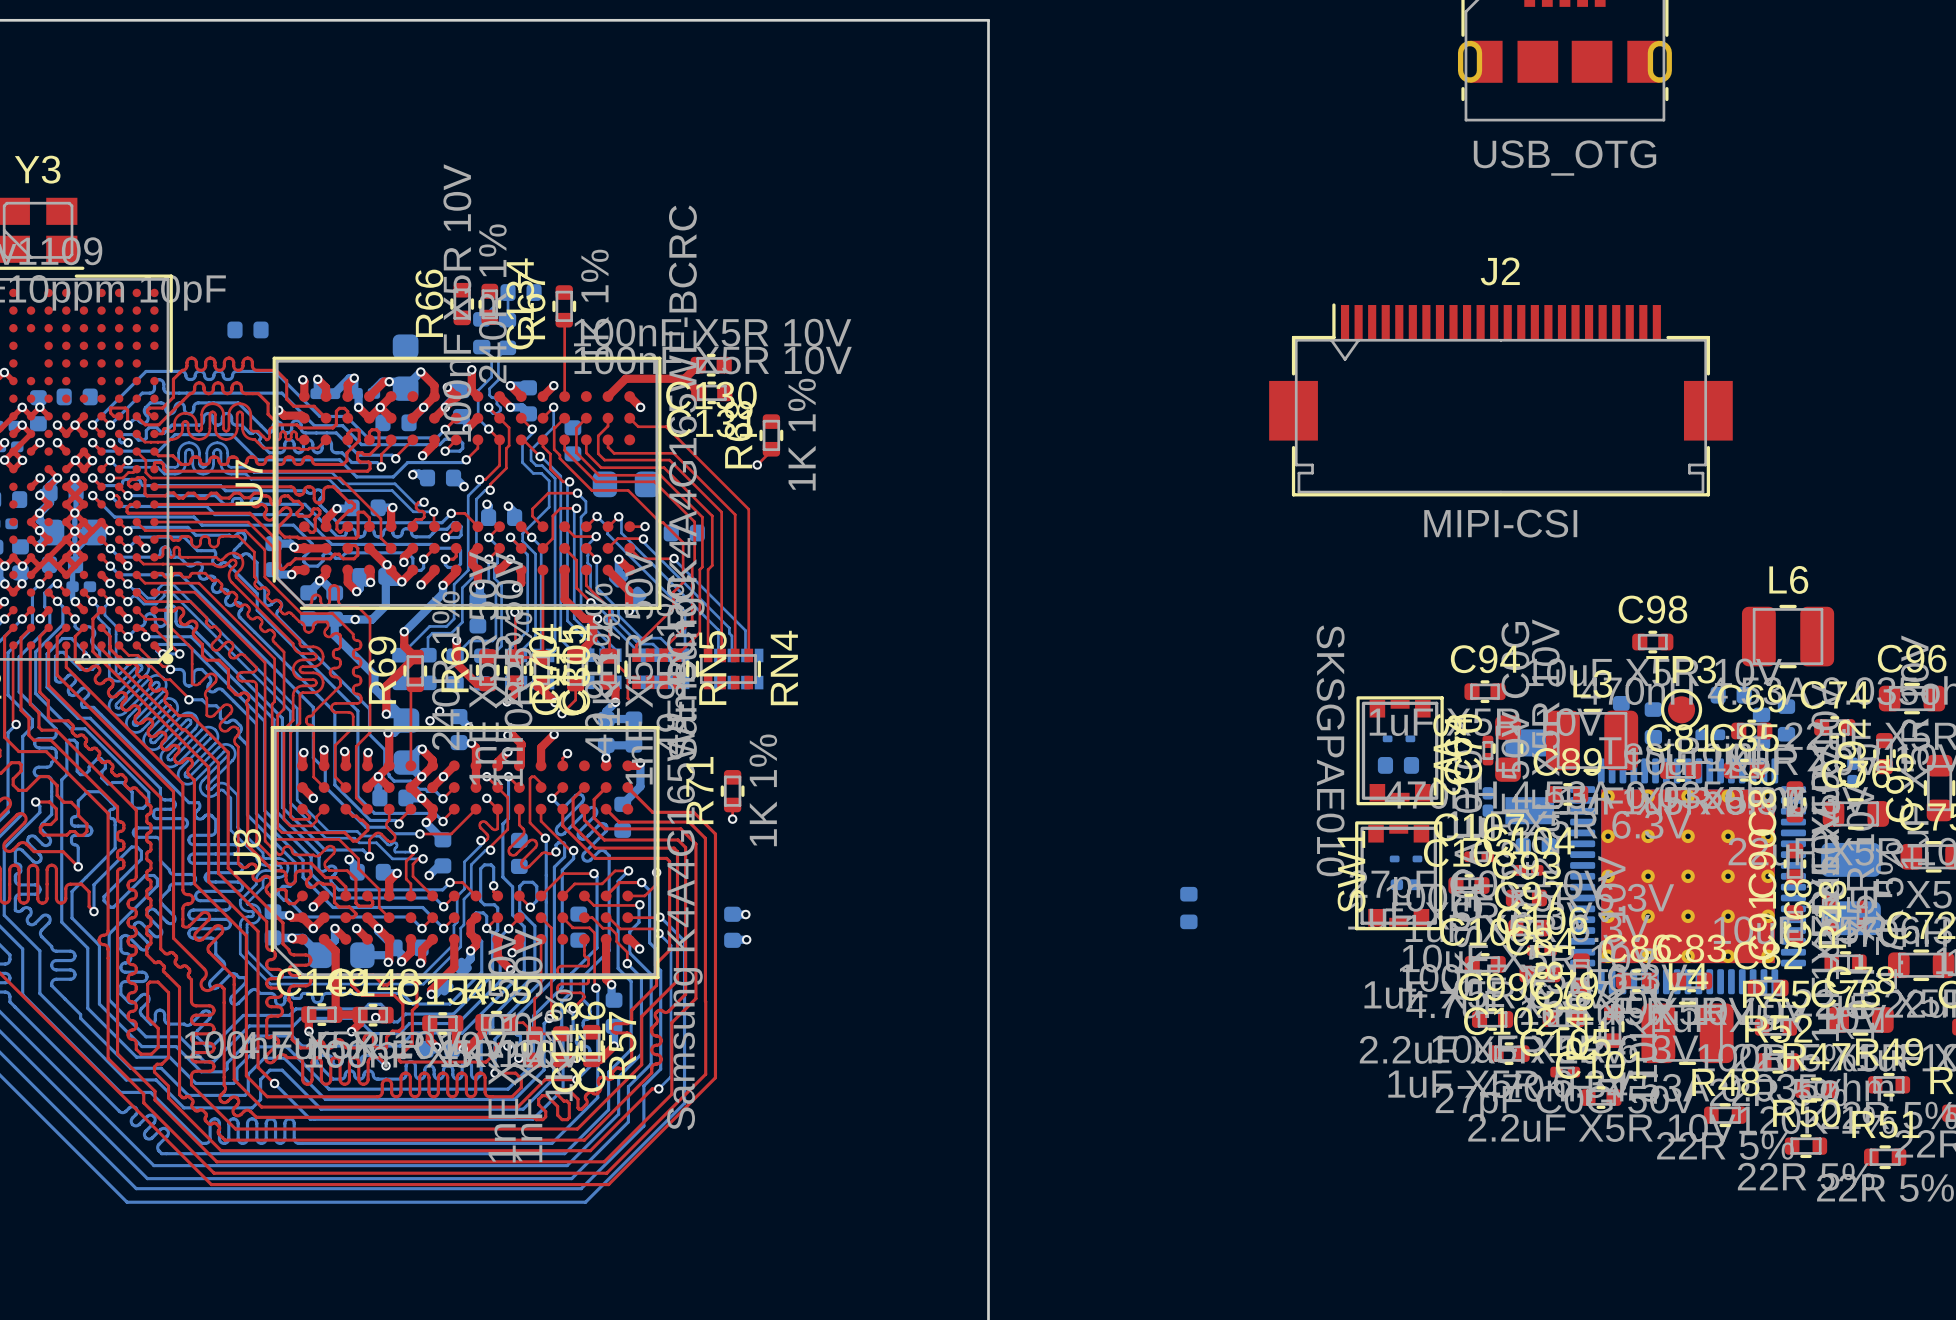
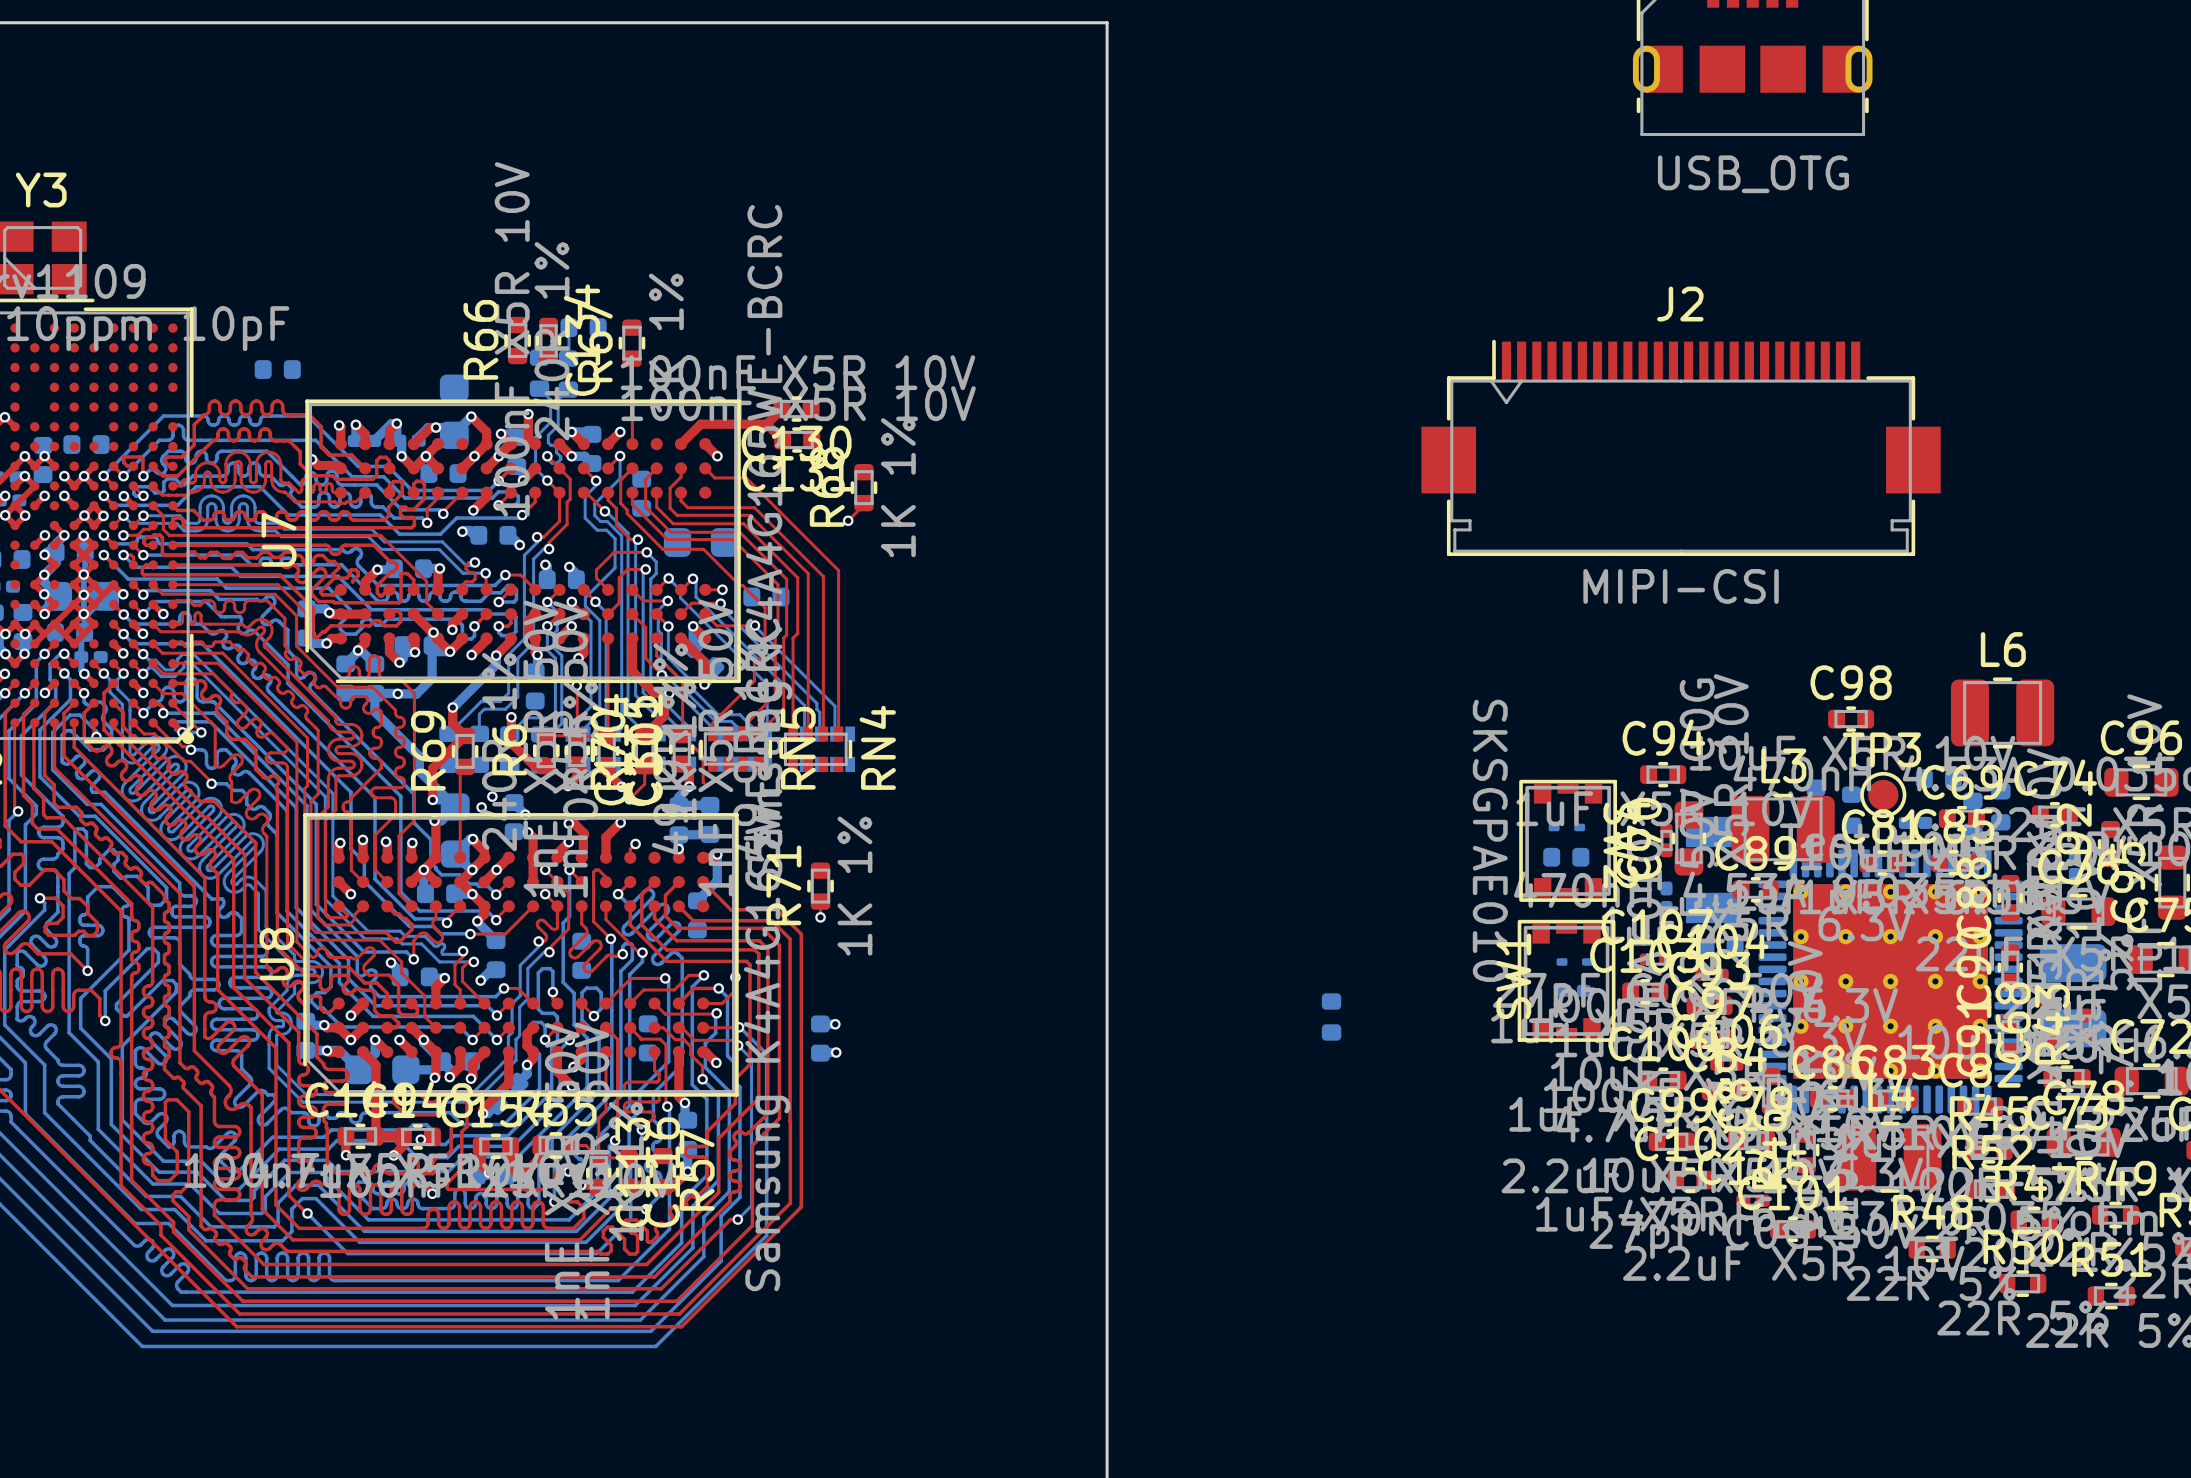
top track: (309, 486) (313, 489) (314, 500) (318, 503) (323, 500) (324, 489) (328, 486) -> (346, 545) (367, 545)
top track: (315, 520) (315, 530) (313, 532) (310, 532) (304, 526) -> (333, 579) (321, 593) (333, 594) (338, 589) (340, 589)

